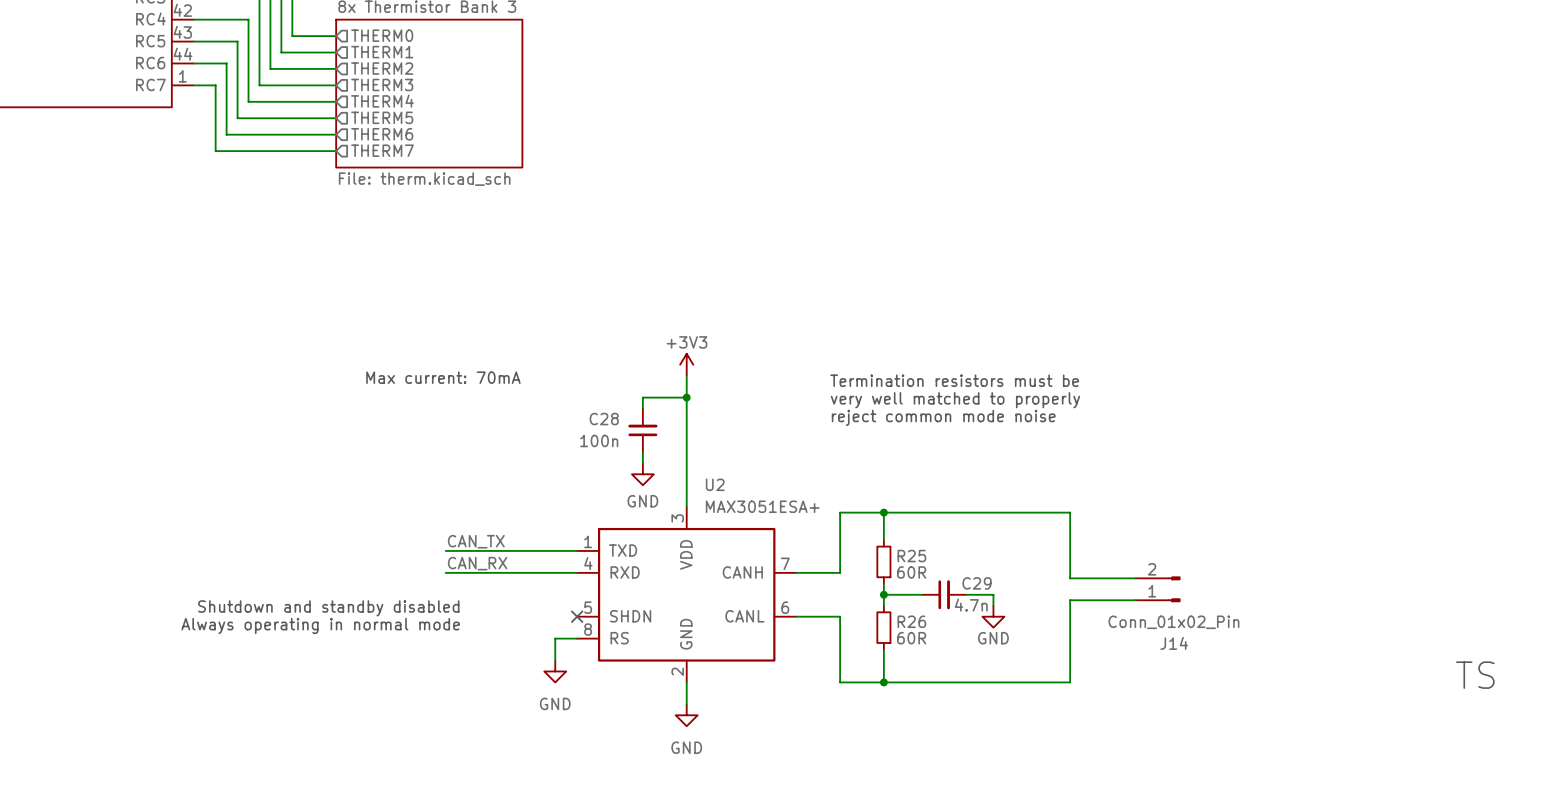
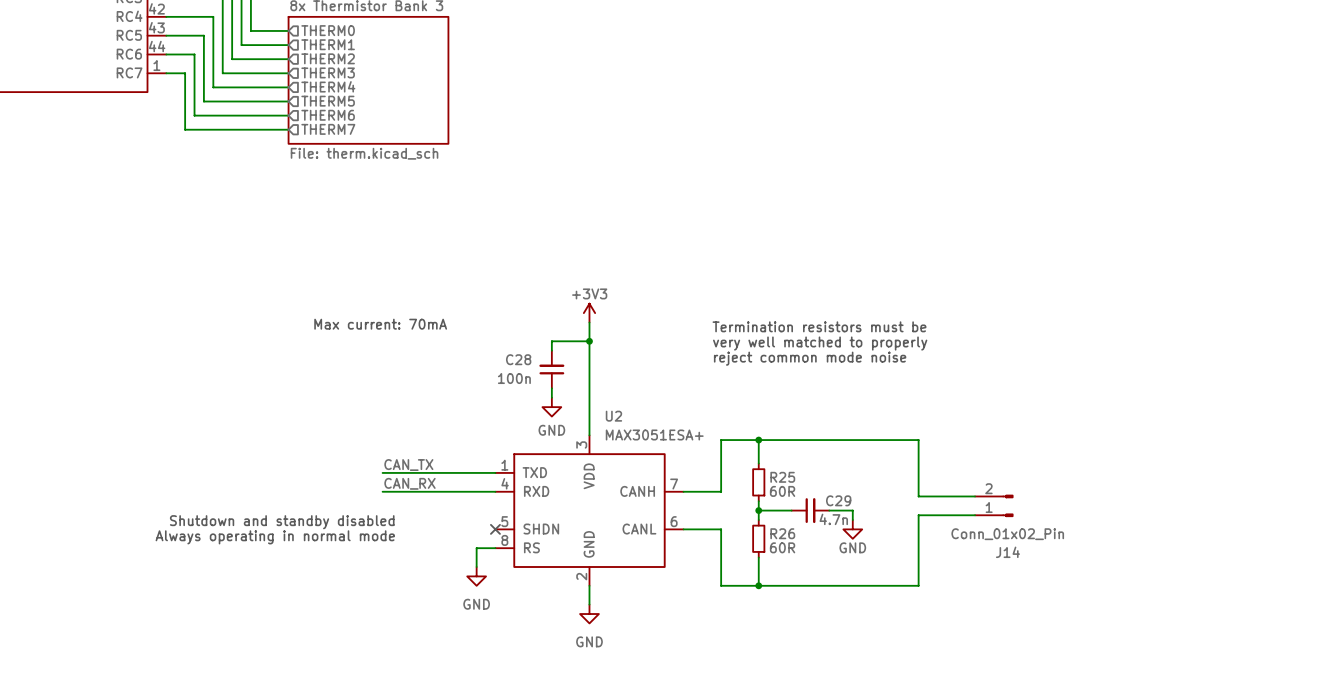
text: TS (1475, 675) -> none

